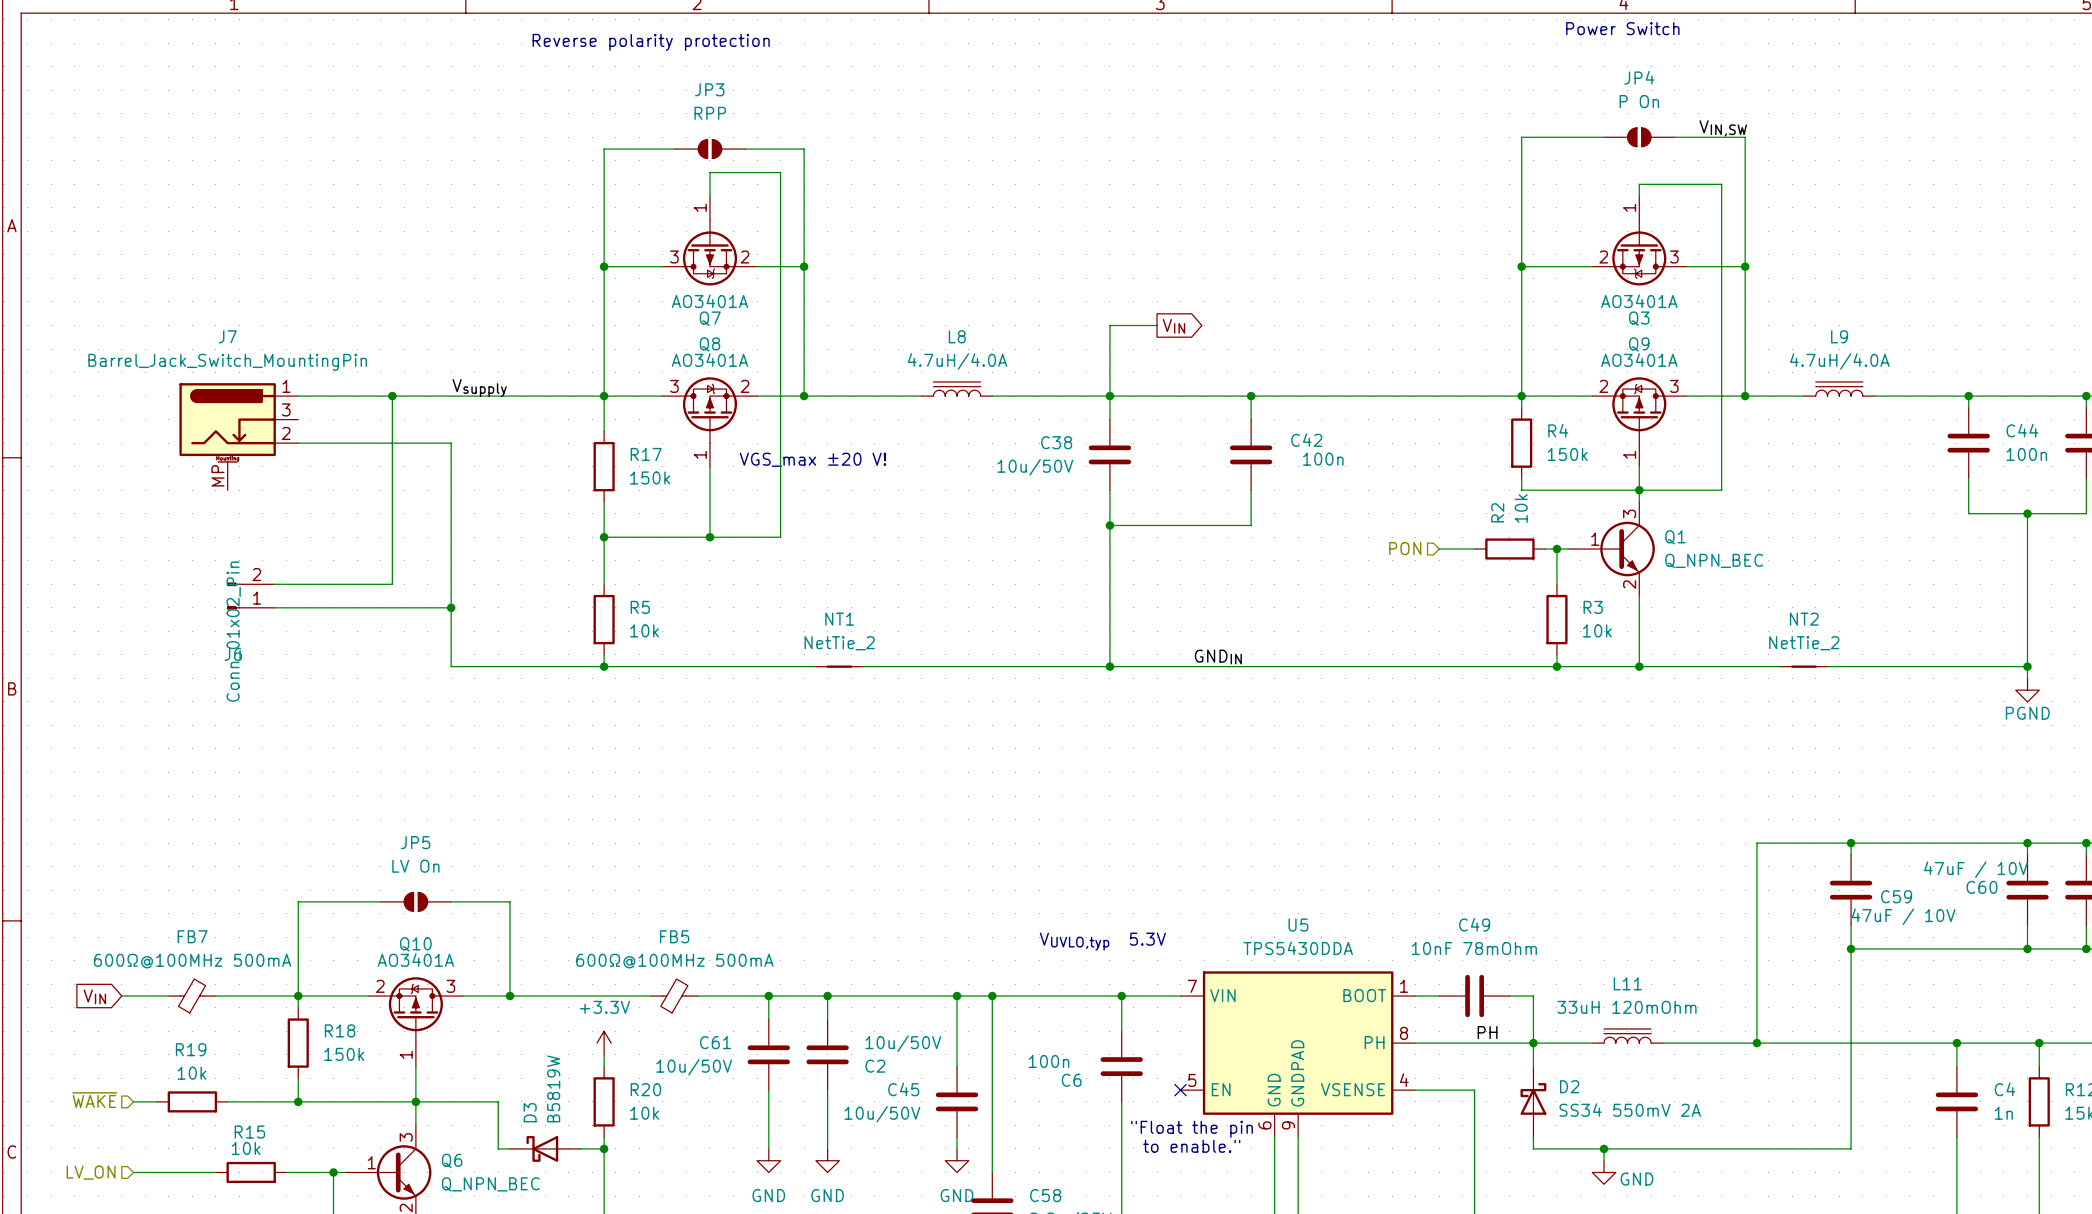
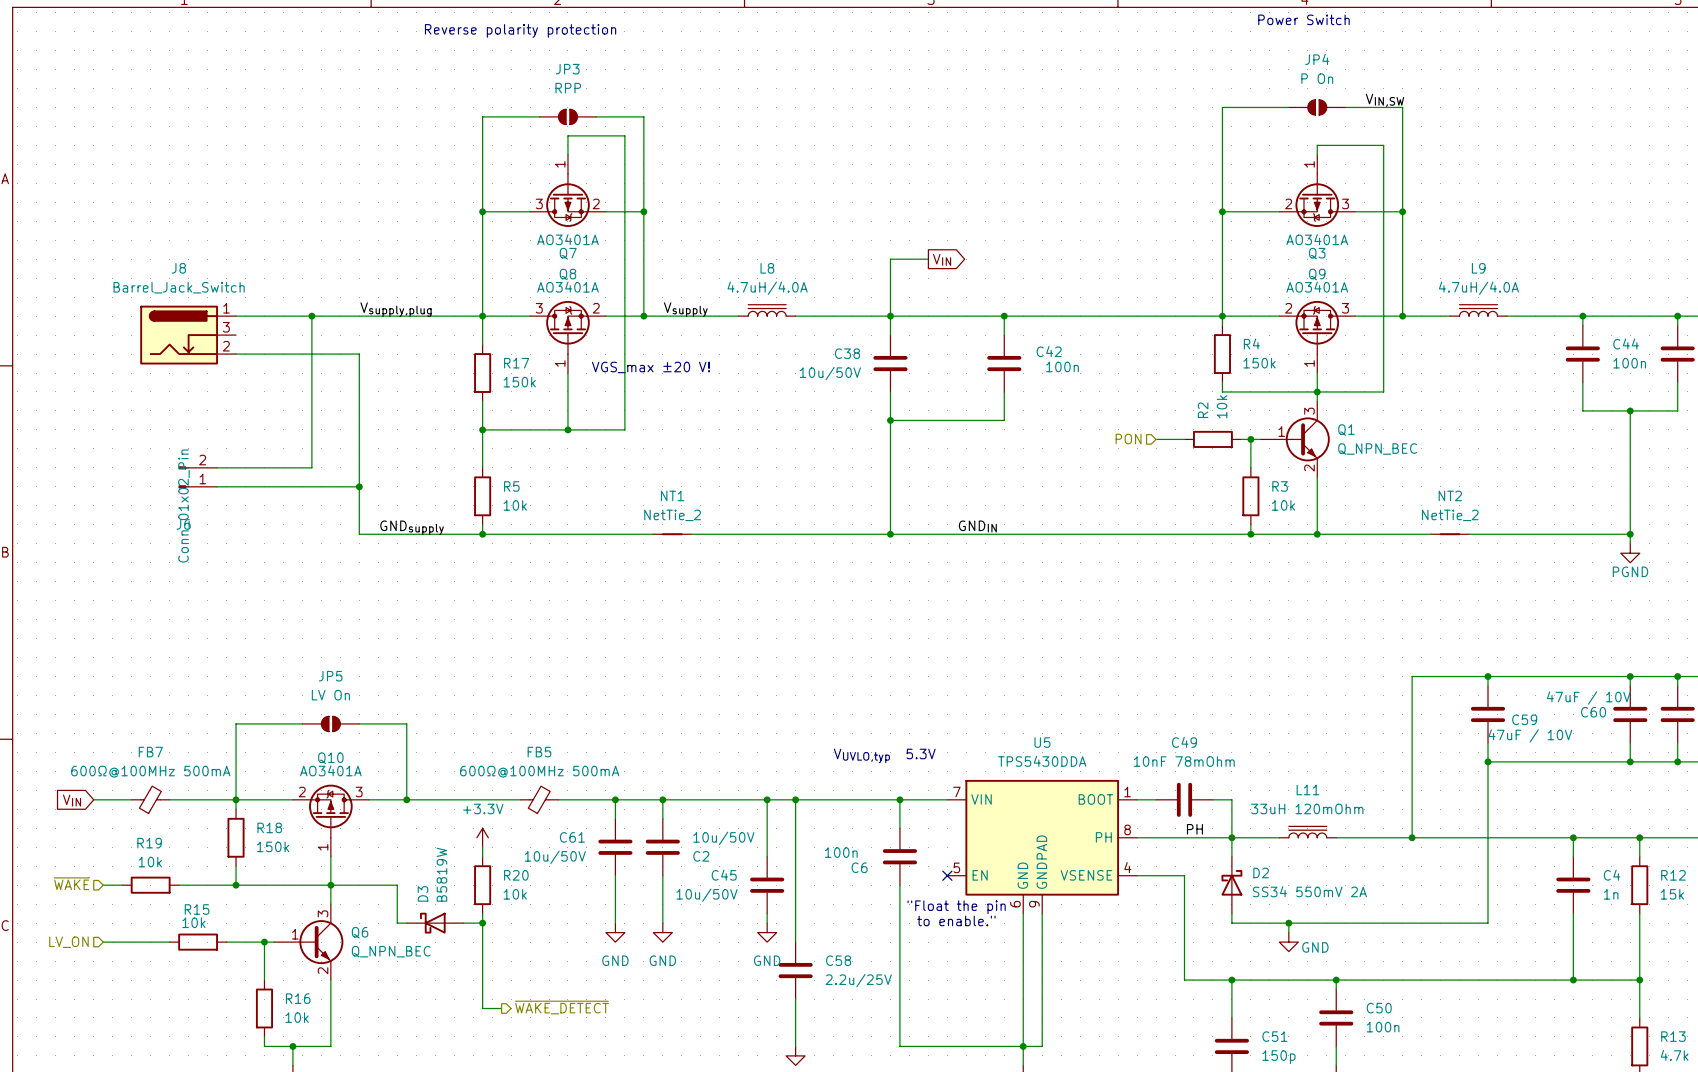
label: Vsupply (479, 388) -> Vsupply,plug (396, 309)
label: none -> Vsupply (685, 309)
J8: none -> Barrel_Jack_Switch (188, 335)
J7: Barrel_Jack_Switch_MountingPin (238, 436) -> none
label: none -> GNDsupply (412, 527)

